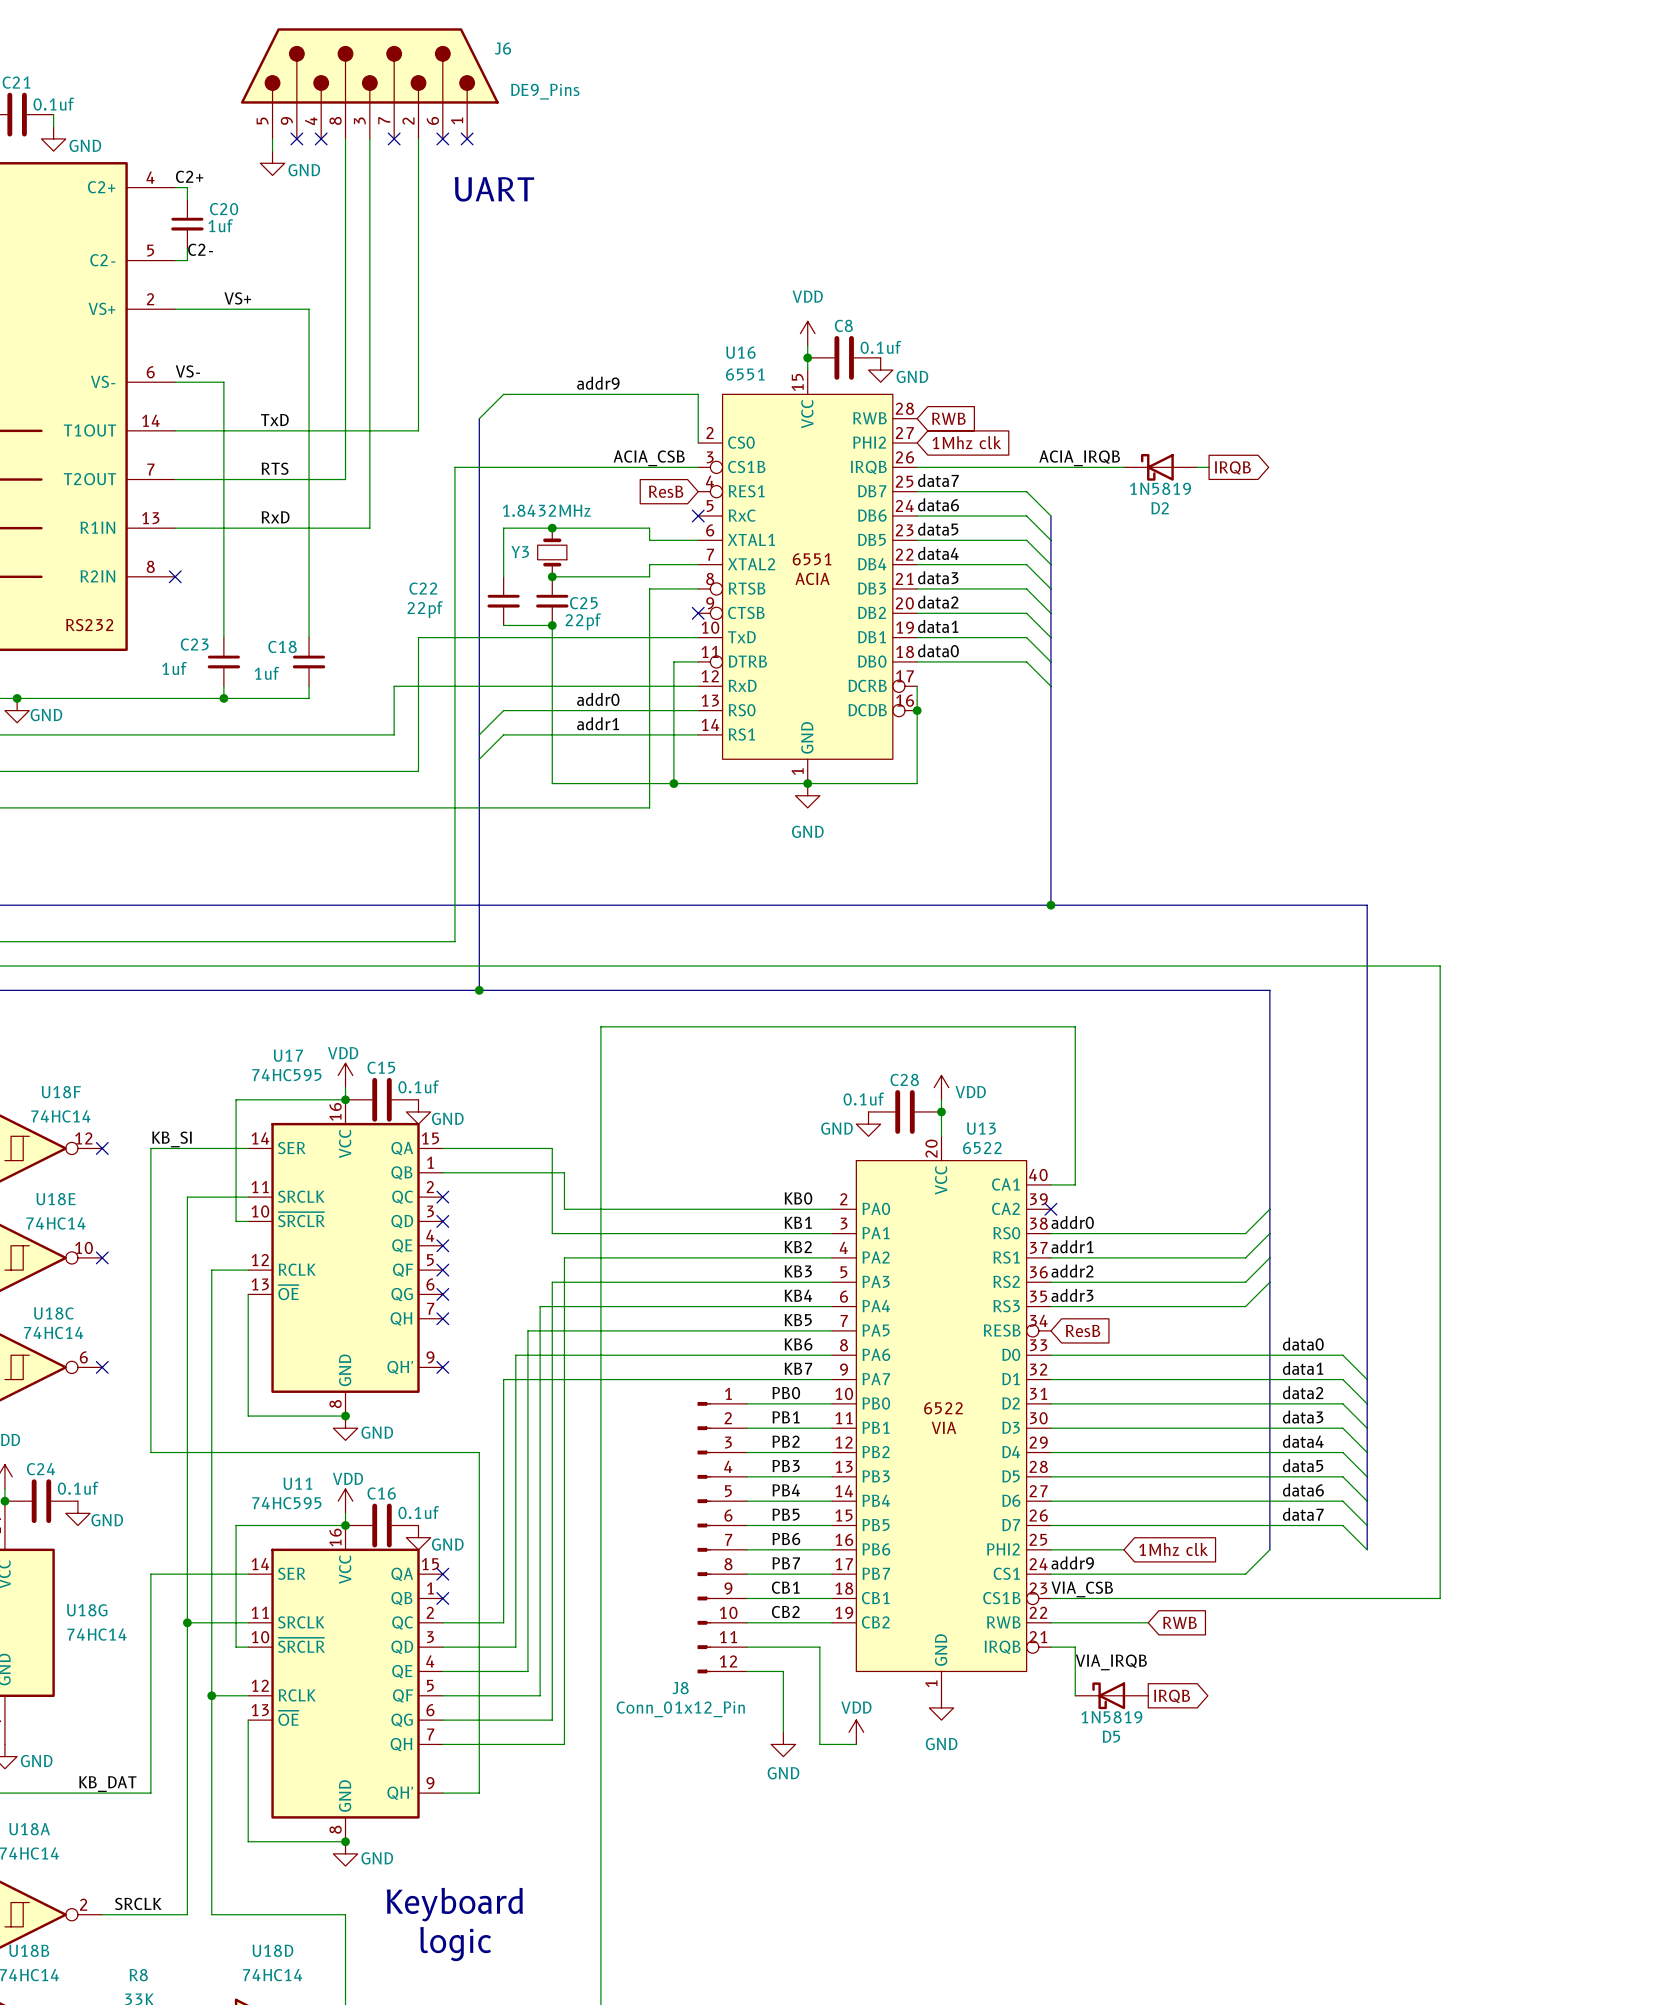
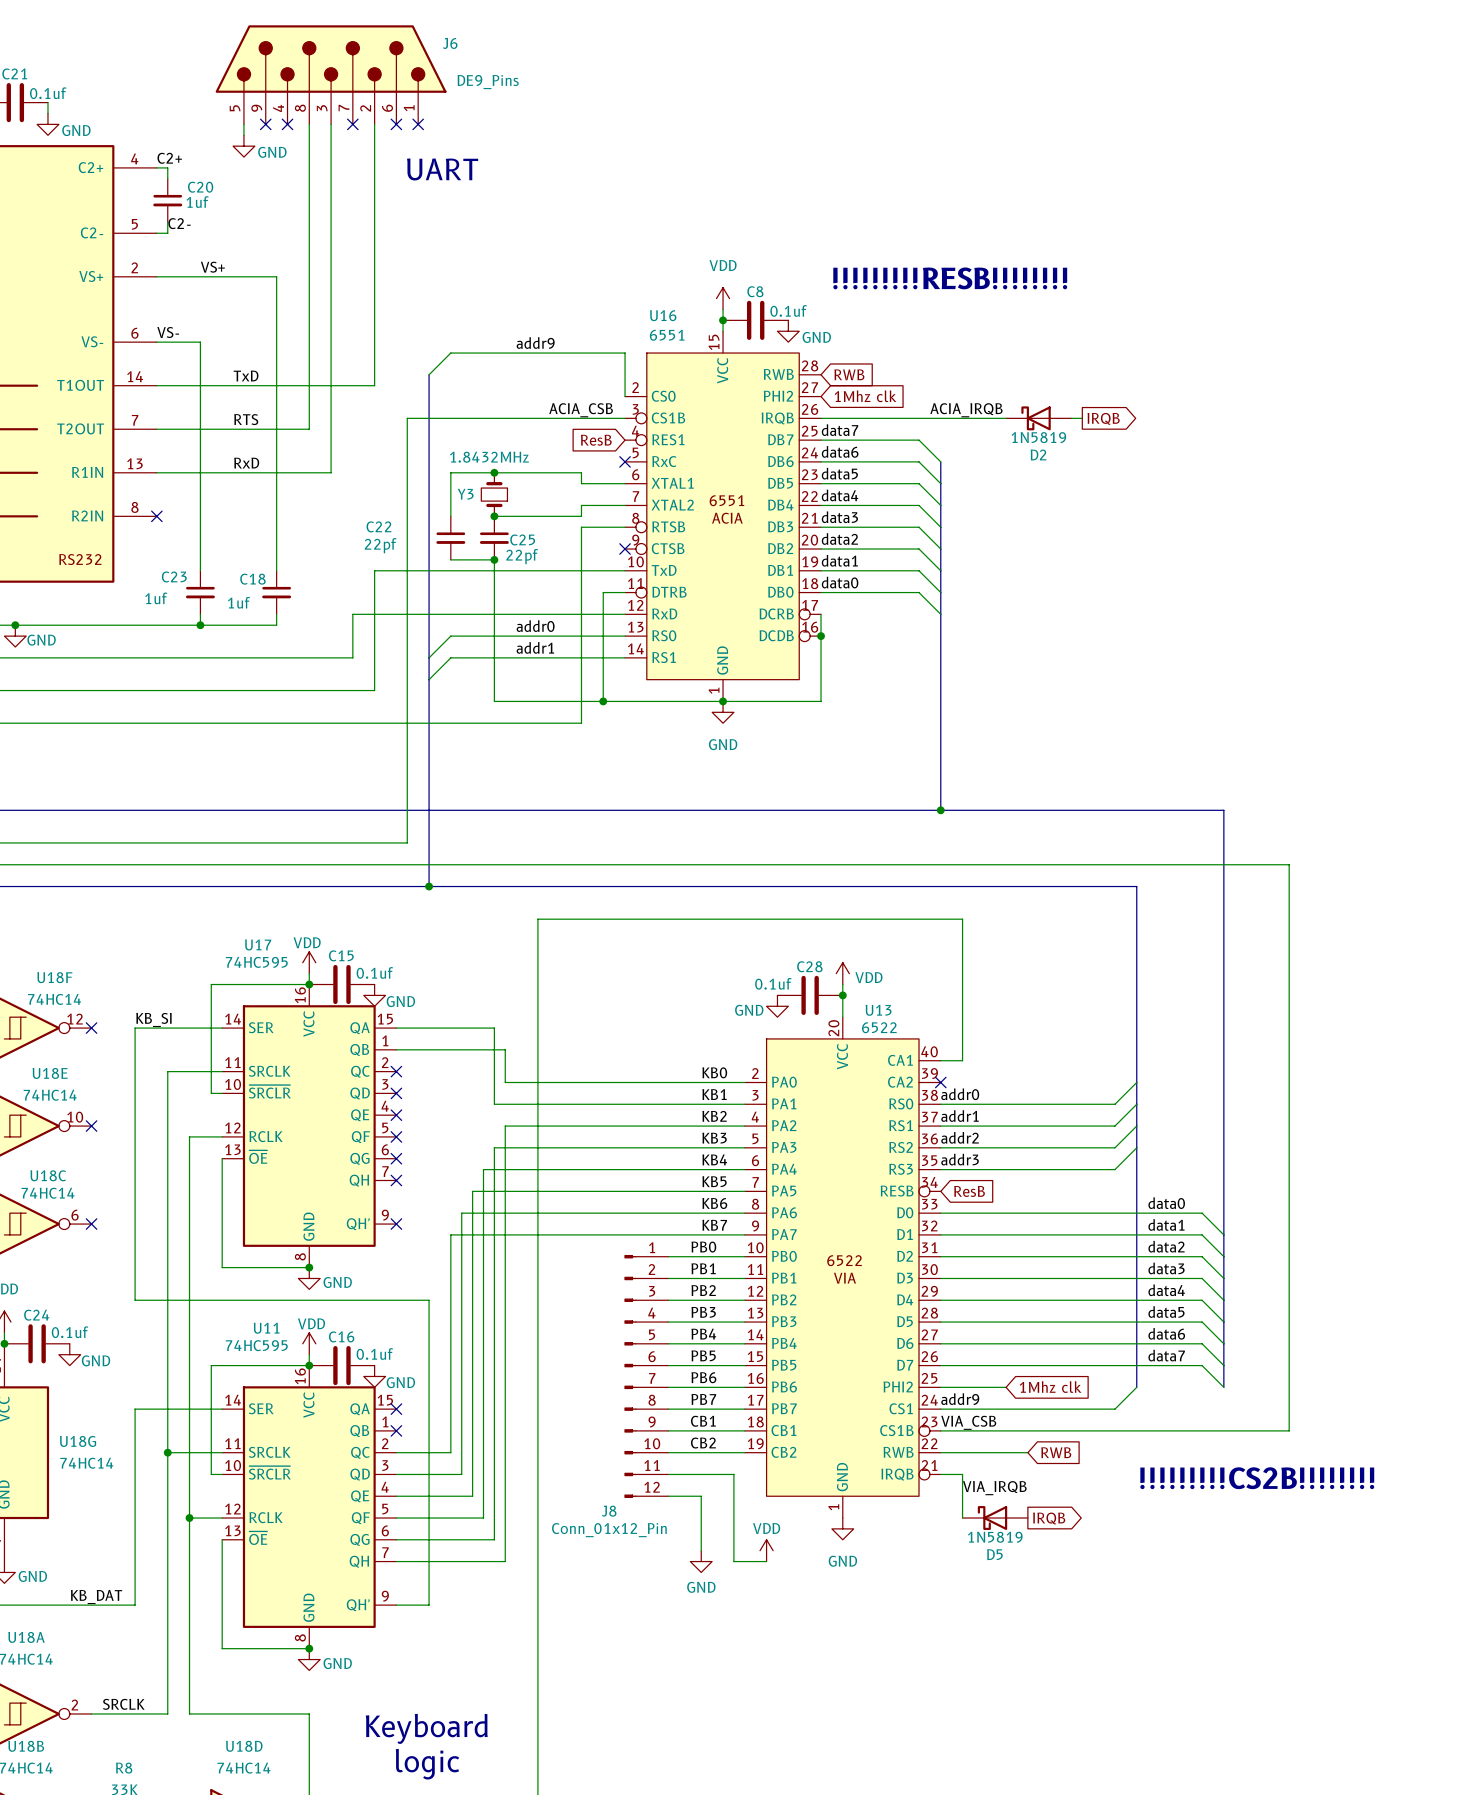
text: none -> !!!!!!!!!RESB!!!!!!!! (950, 278)
text: none -> !!!!!!!!!CS2B!!!!!!!! (1257, 1478)
text position: Keyboard (454, 1904) -> Keyboard (426, 1728)
text position: logic (455, 1944) -> logic (427, 1764)

